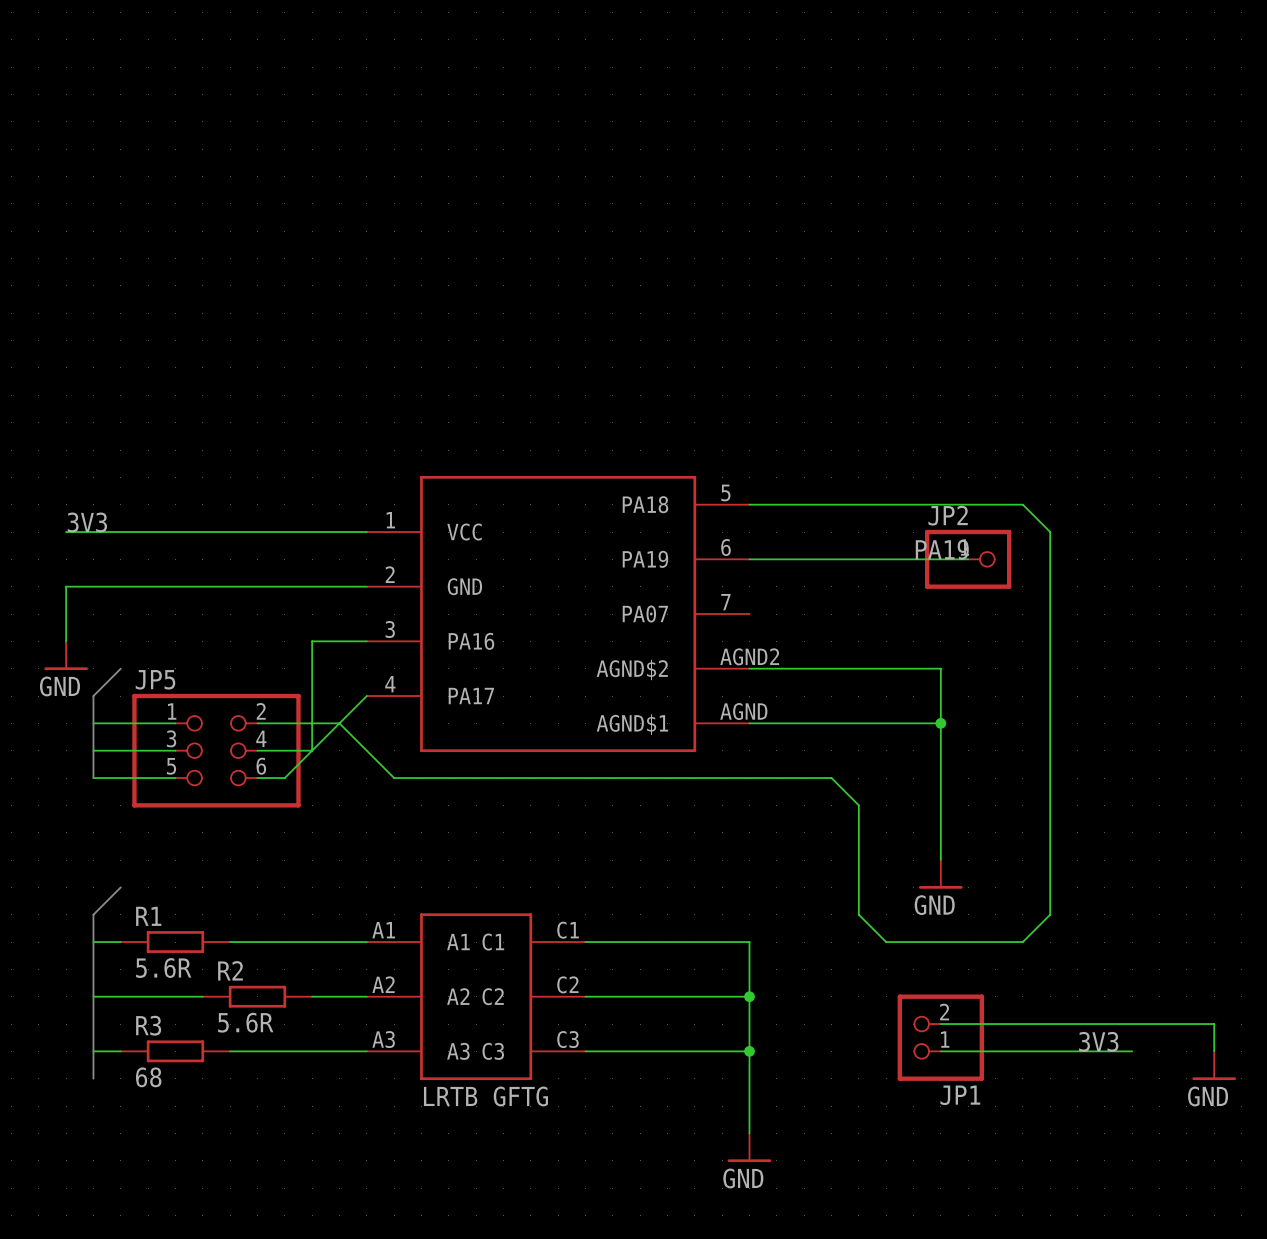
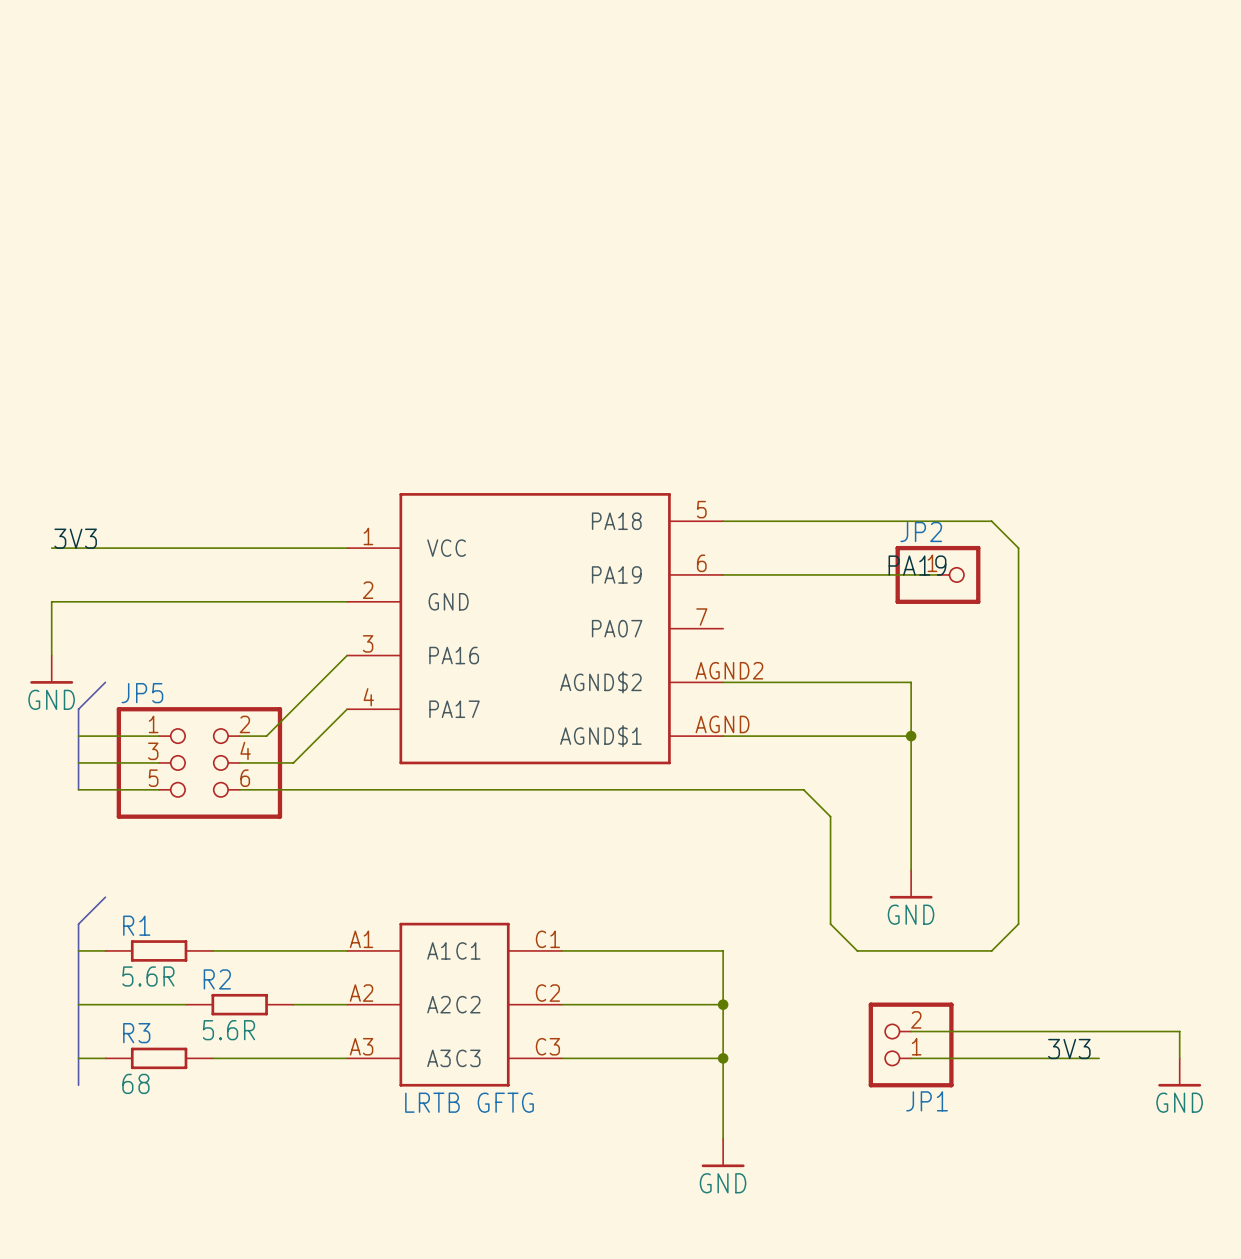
wire: (366, 641) (312, 641) (312, 750) (284, 778) -> (347, 655) (266, 736)
wire: (284, 723) (339, 723) (394, 778) -> (266, 789) (373, 789)

